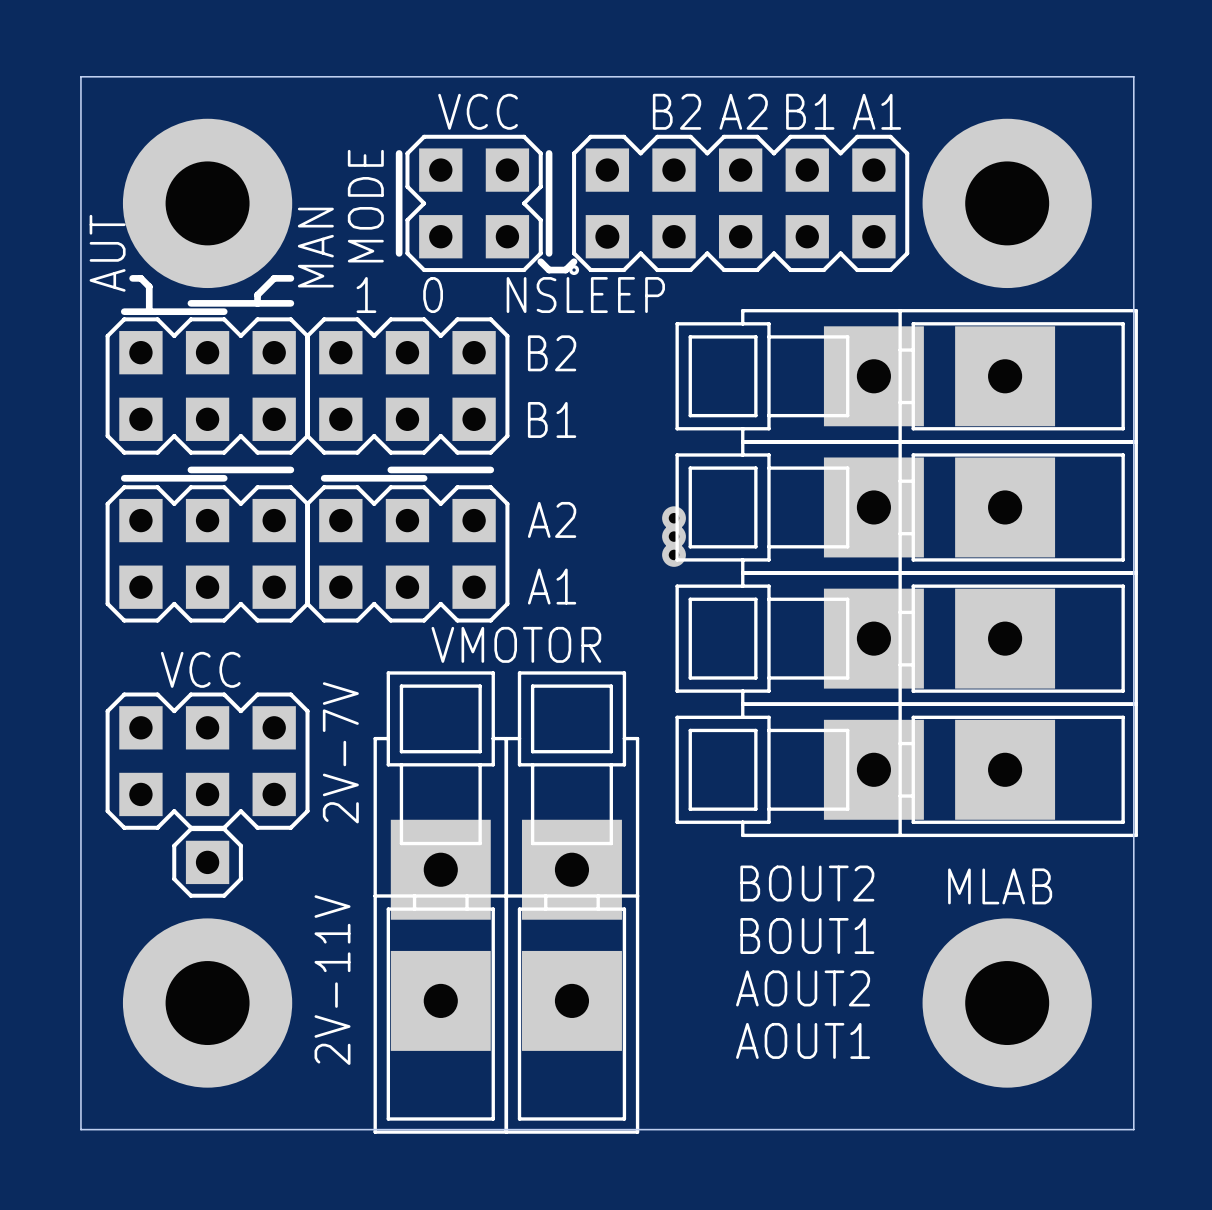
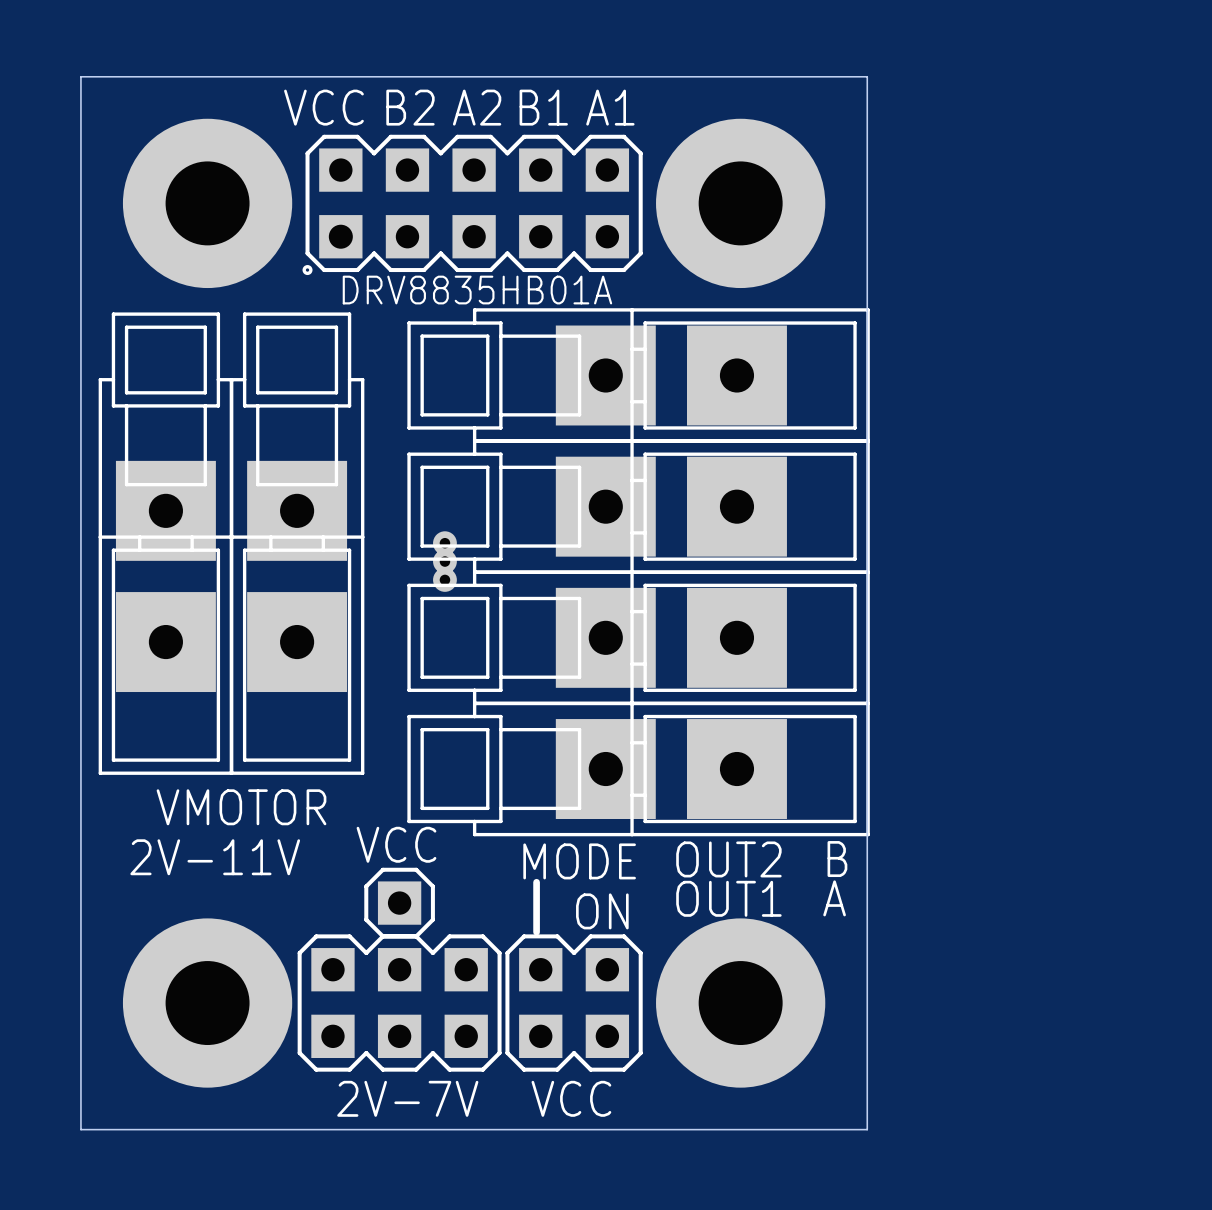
board edge: (867, 76) (1133, 76) (1133, 1129) (867, 1129) -> (867, 76) (867, 1129)
text: none -> B2 (410, 107)
text: none -> A2 (477, 107)
text: none -> B1 (543, 107)
text: none -> A1 (610, 107)
text position: VCC (478, 111) -> VCC (323, 107)
text: B2 (677, 111) -> none
text: A2 (743, 111) -> none
text: B1 (810, 111) -> none
text: A1 (876, 111) -> none
part footprint: [405, 134, 543, 273] -> [302, 134, 643, 276]
part footprint: [569, 134, 910, 276] -> [656, 118, 826, 289]
line: (399, 153) (399, 253) -> none
line: (549, 153) (549, 253) -> none
part: (1007, 203) -> none
text rotation: 0° (365, 206) -> 90° clockwise (579, 861)
text position: MODE (365, 206) -> MODE (579, 861)
text: MAN (315, 247) -> DRV8835HB01A (477, 290)
text: AUT (107, 253) -> none
line: (540, 261) (549, 270) (565, 270) (574, 261) -> none
line: (132, 278) (140, 278) (149, 286) (149, 311) -> none
line: (290, 278) (274, 278) (257, 295) (257, 303) -> none
text: 1 (366, 295) -> none
text: 0 (433, 295) -> none
text: NSLEEP (585, 295) -> none
line: (190, 303) (290, 303) -> none
line: (124, 311) (224, 311) -> none
text: B2 (552, 353) -> none
part: none -> (638, 375)
part: (906, 376) -> none
part: (207, 385) -> none
part: (407, 385) -> none
text: B1 (552, 419) -> none
line: (190, 469) (290, 469) -> none
line: (390, 469) (490, 469) -> none
line: (124, 478) (224, 478) -> none
line: (324, 478) (424, 478) -> none
part: none -> (638, 506)
part: (906, 507) -> none
text: A2 (552, 519) -> none
part position: (674, 536) -> (444, 561)
part: none -> (165, 543)
part: none -> (297, 543)
part: (207, 553) -> none
part: (407, 553) -> none
text: A1 (552, 586) -> none
part: none -> (638, 637)
part: (906, 638) -> none
text position: VMOTOR (516, 644) -> VMOTOR (241, 807)
text position: VCC (200, 669) -> VCC (396, 844)
text rotation: 0° (340, 752) -> 90° clockwise (407, 1098)
text position: 2V-7V (340, 752) -> 2V-7V (407, 1098)
part: (207, 761) -> none
part: none -> (638, 769)
part: (906, 769) -> none
text: none -> OUT2 (728, 859)
text: none -> B (837, 859)
part position: (207, 862) -> (399, 903)
line: none -> (536, 882) (536, 932)
text: BOUT2 (807, 883) -> none
text: MLAB (1000, 886) -> none
text: none -> OUT1 (728, 898)
text: none -> A (834, 898)
part: (440, 902) -> none
part: (571, 902) -> none
text: none -> ON (602, 911)
text: BOUT1 (807, 935) -> none
text rotation: 0° (332, 980) -> 90° clockwise (215, 857)
text: AOUT2 (803, 988) -> none
part: none -> (399, 1003)
part: none -> (574, 1003)
part position: (1007, 1003) -> (740, 1003)
text: AOUT1 (803, 1040) -> none
text: none -> VCC (571, 1098)

